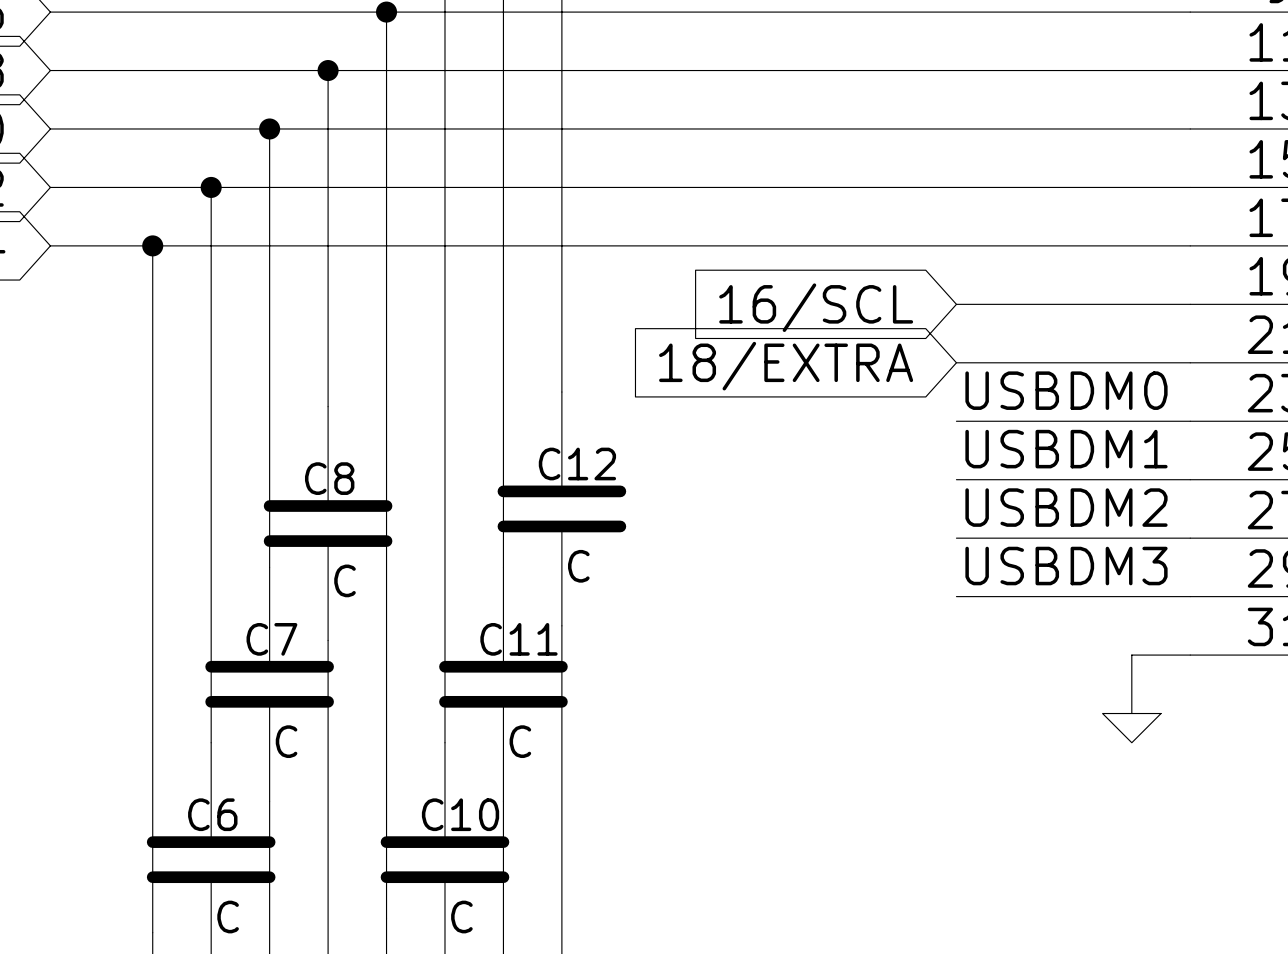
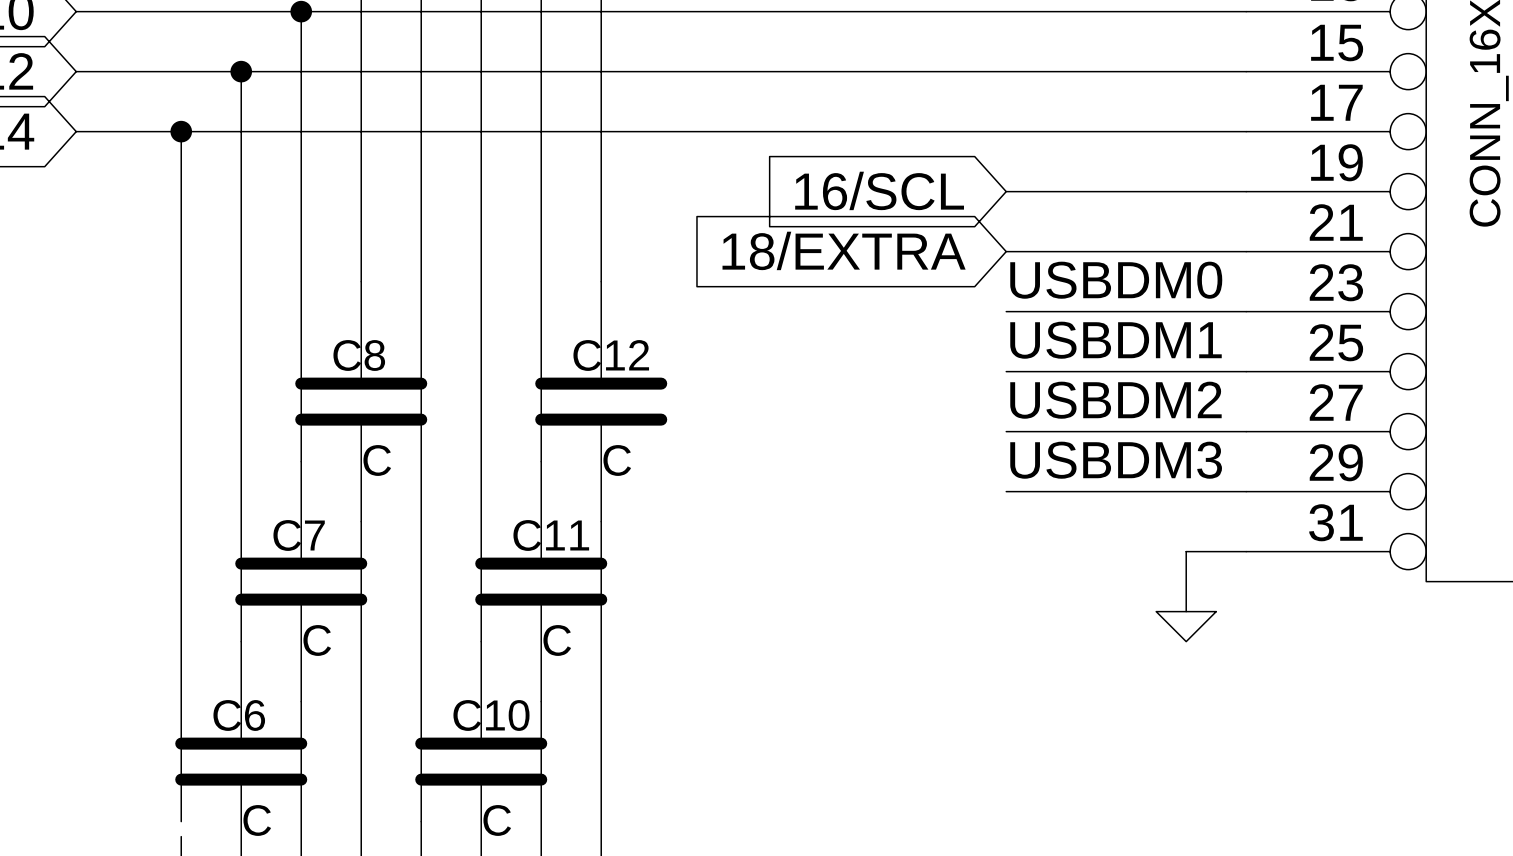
C8 position: (328, 523) -> (361, 401)
wire: (152, 918) (152, 932) -> none

